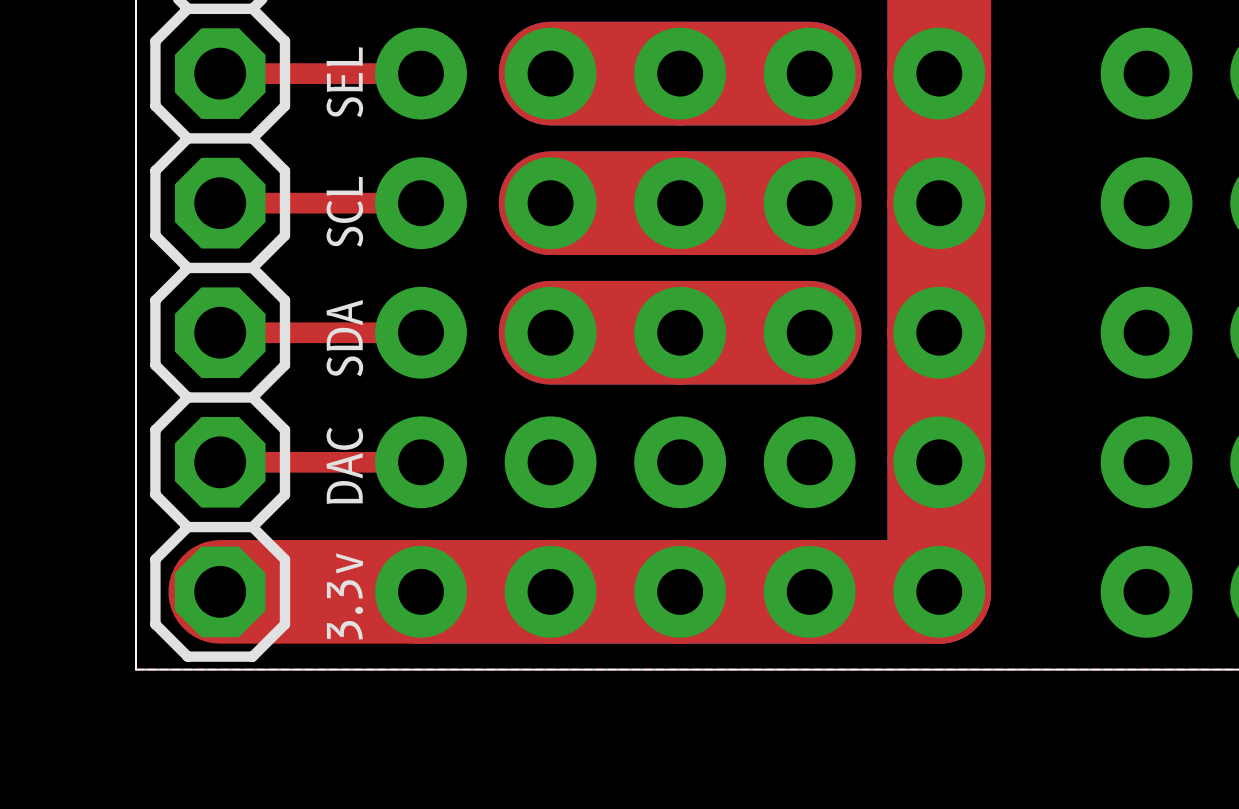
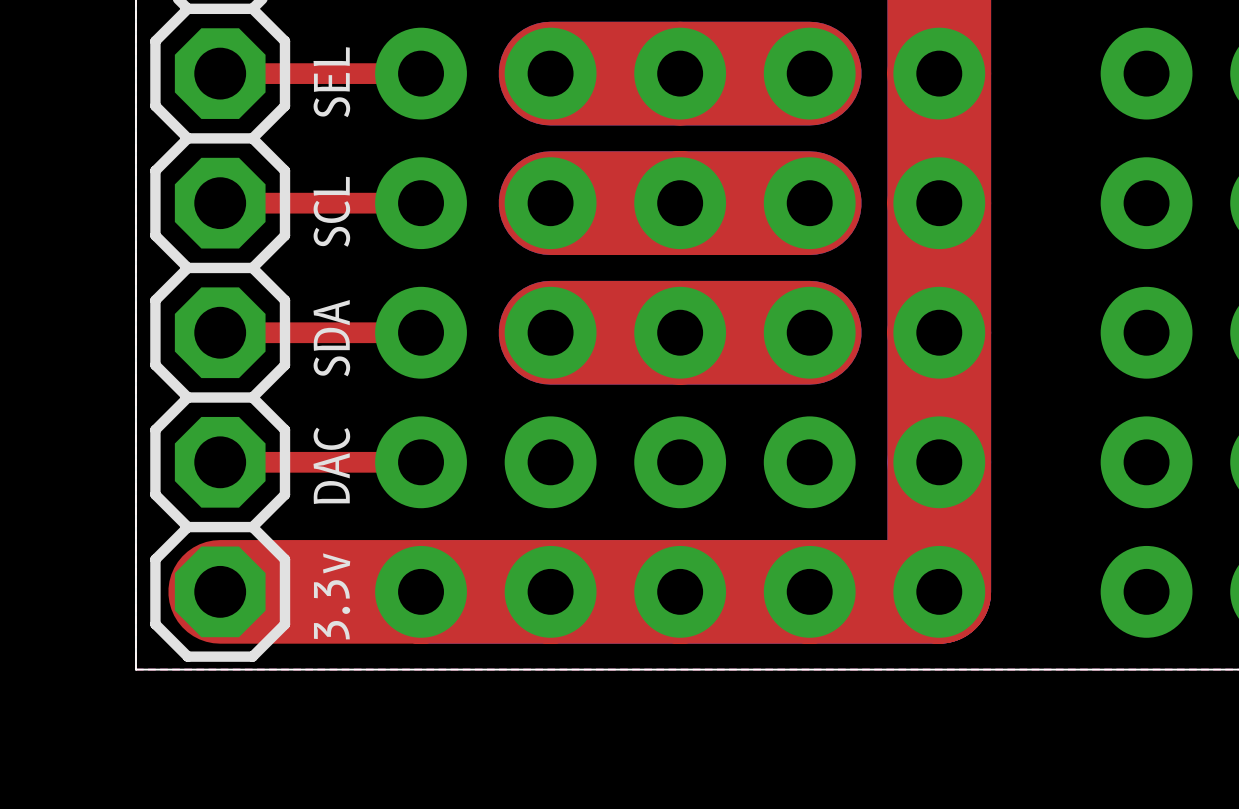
text position: SEL (344, 82) -> SEL (331, 82)
text position: SCL (344, 211) -> SCL (331, 211)
text position: SDA (344, 338) -> SDA (331, 338)
text position: DAC (344, 465) -> DAC (331, 465)
text position: 3.3v (345, 596) -> 3.3v (332, 596)

